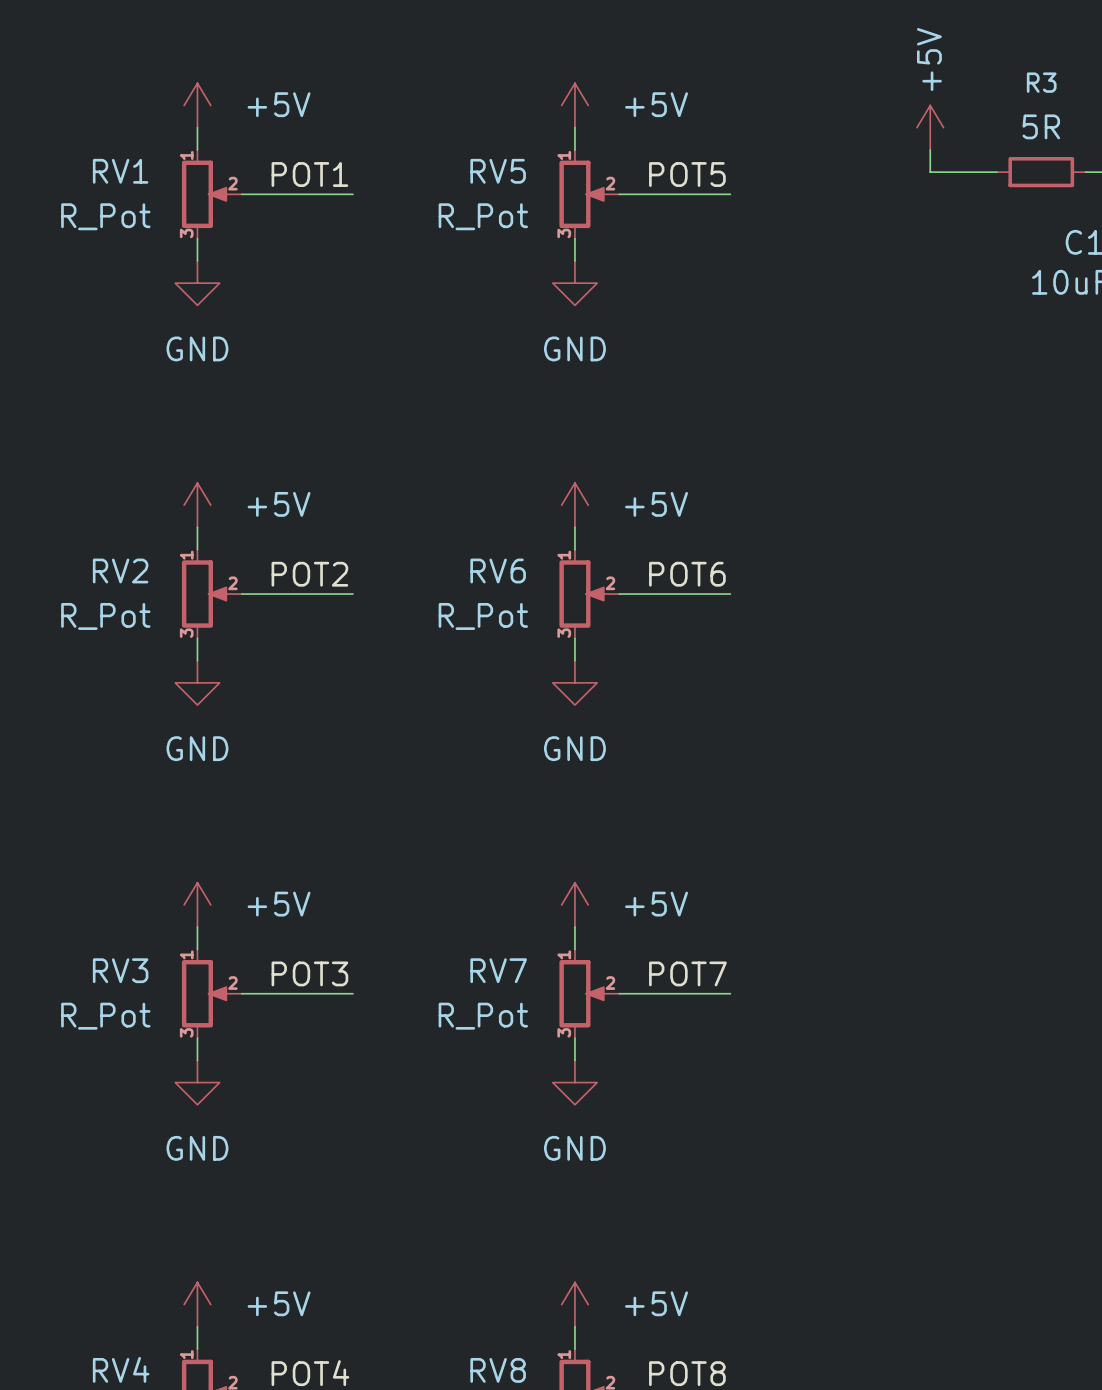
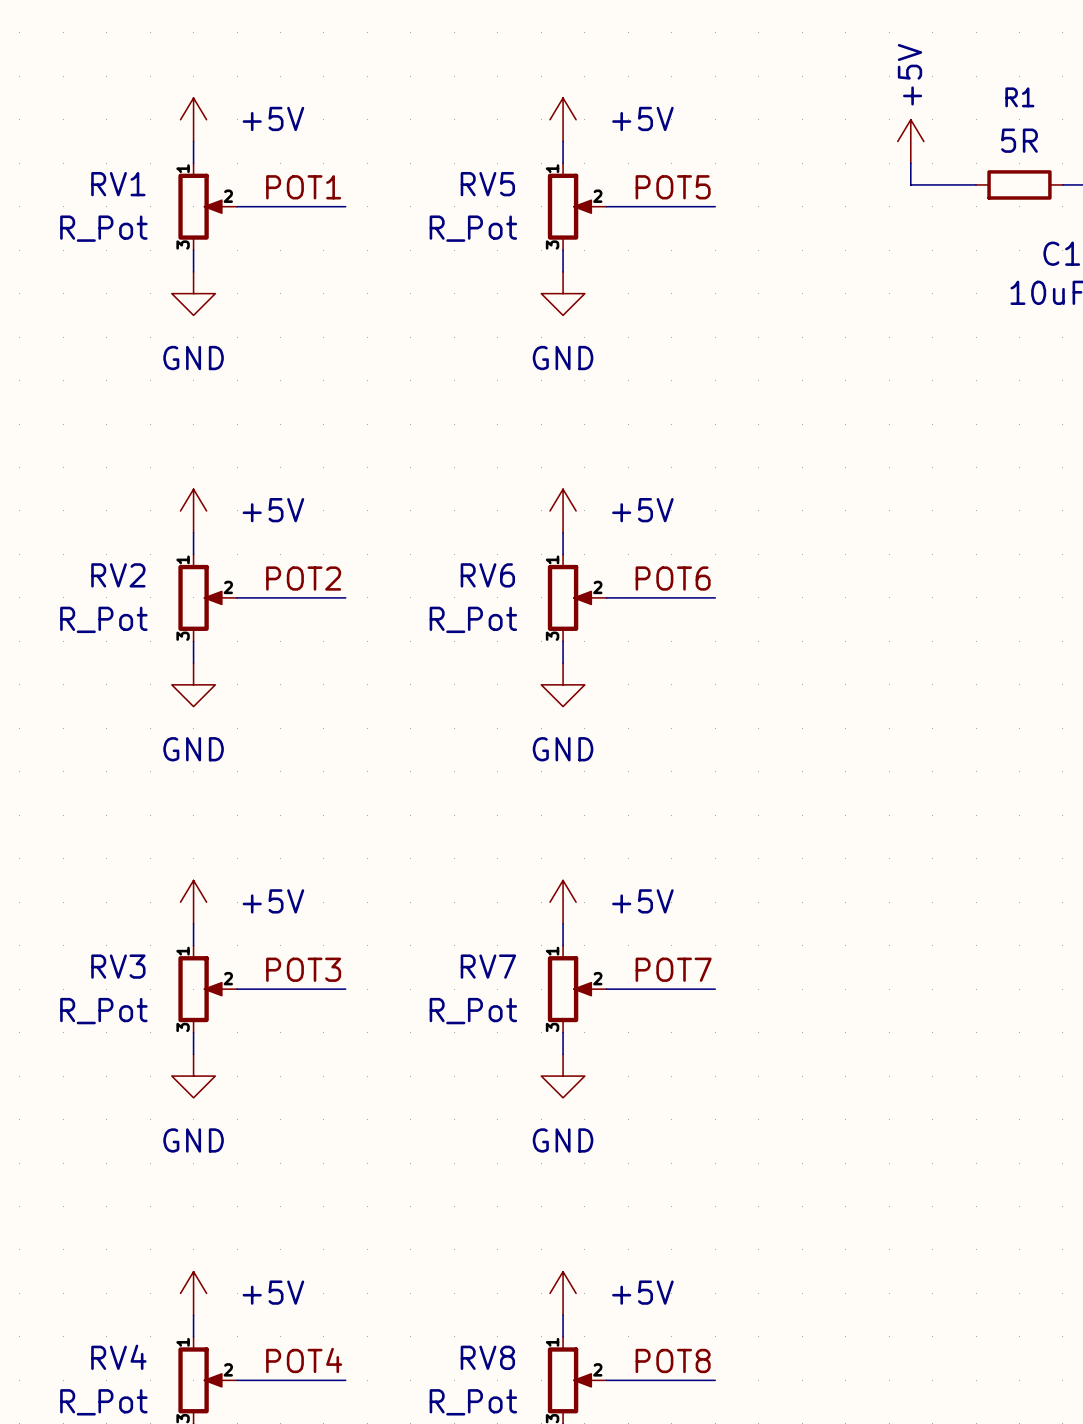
R3 name: R3 (1041, 82) -> R1 (1019, 97)

